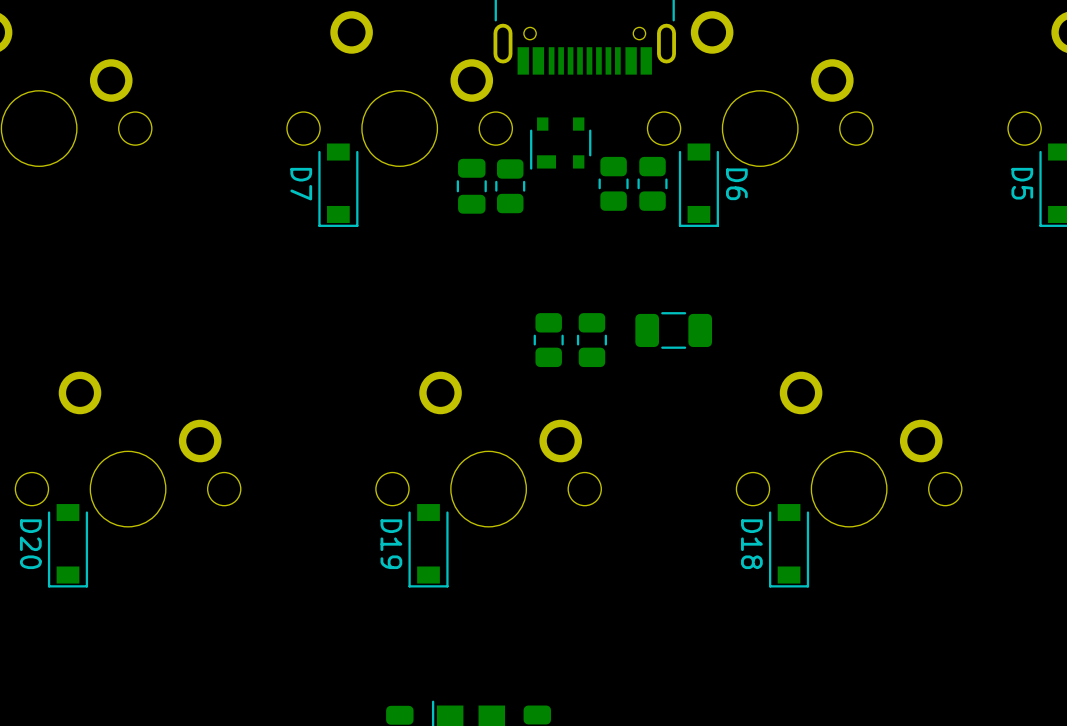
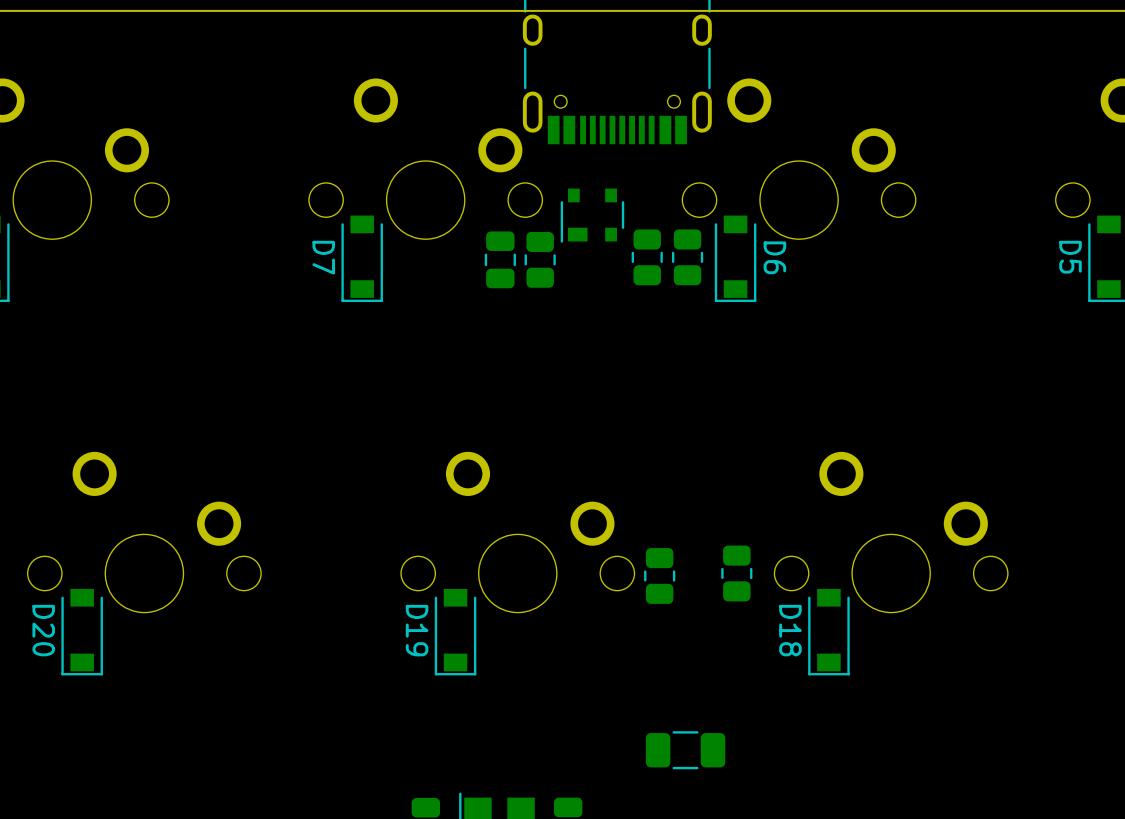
part position: (673, 330) -> (685, 750)
part: (548, 340) -> none
part: (591, 340) -> none
part: none -> (736, 573)
part: none -> (659, 575)

